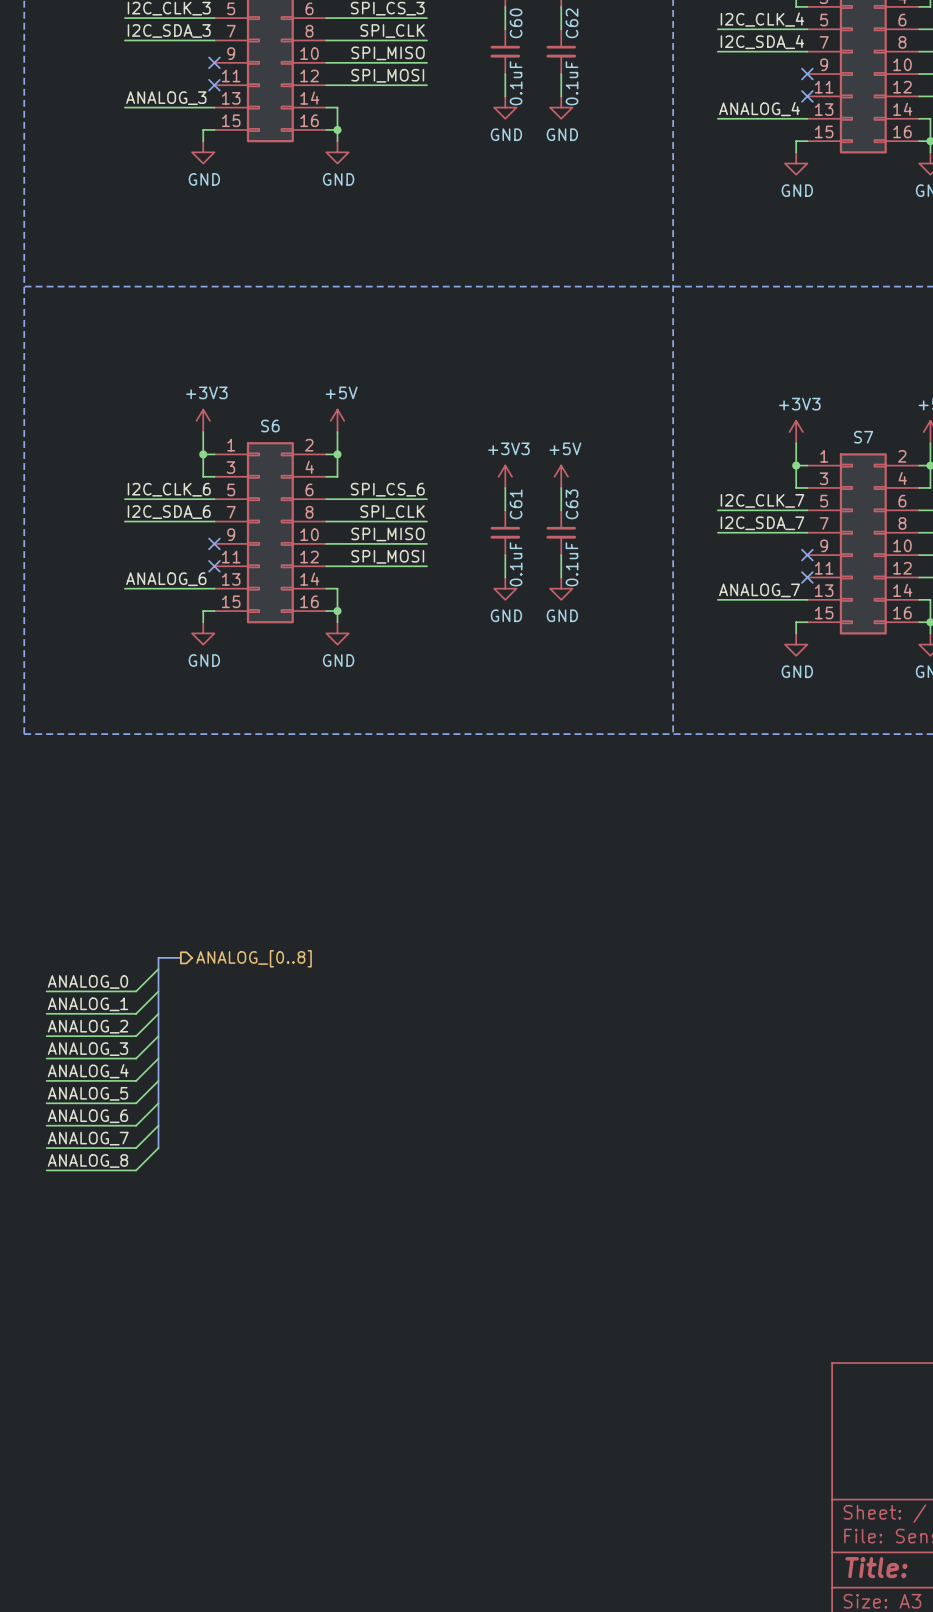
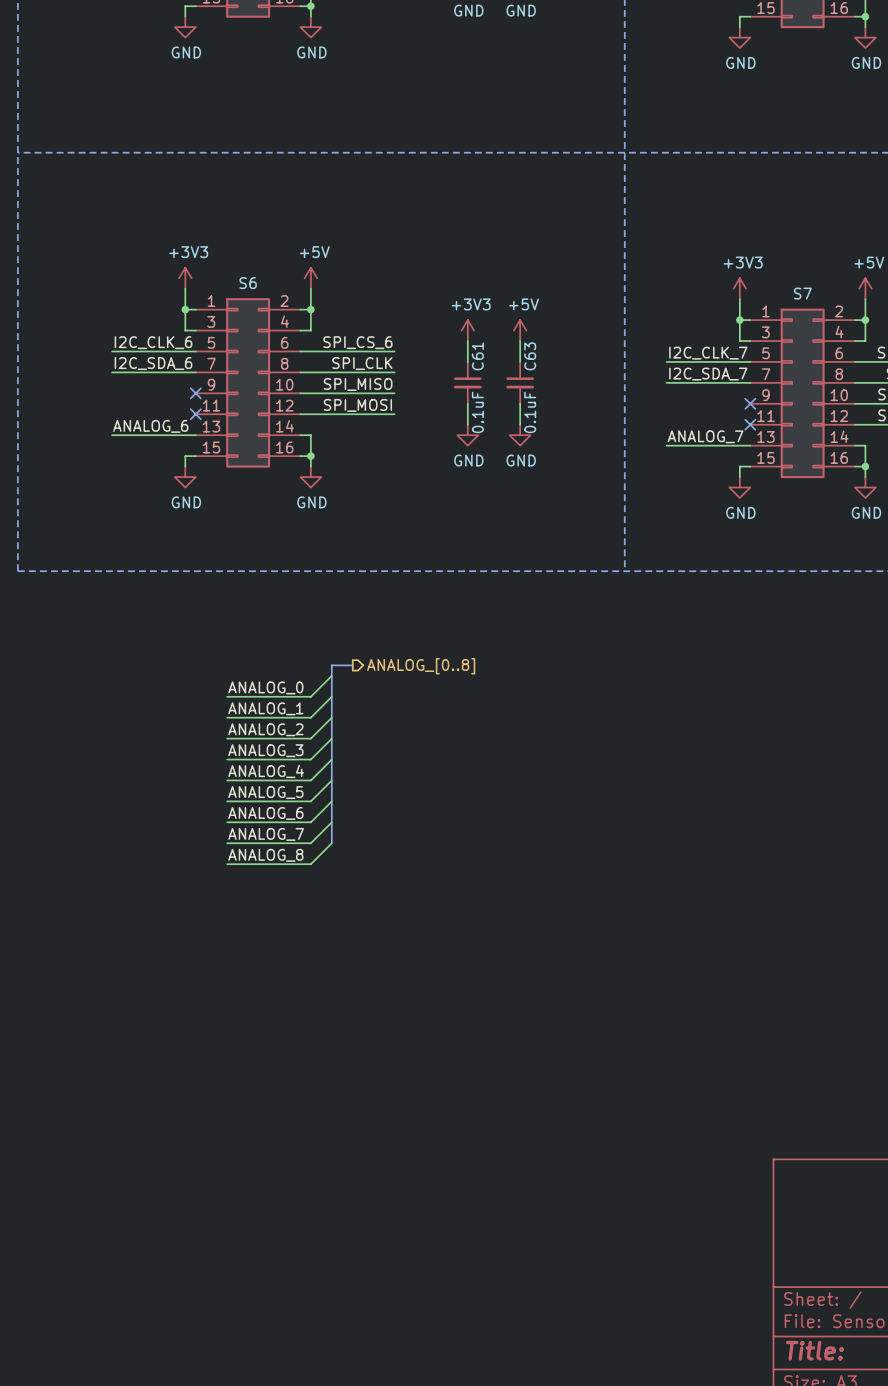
bus: none -> (352, 665) (331, 665) (331, 843)
hierarchical label: none -> ANALOG_[0..8] (421, 666)
wire: none -> (331, 675) (310, 696) (227, 696)
label: none -> ANALOG_0 (265, 687)
wire: none -> (331, 696) (310, 717) (227, 717)
label: none -> ANALOG_1 (265, 708)
label: none -> ANALOG_2 (265, 729)
label: none -> ANALOG_3 (265, 750)
label: none -> ANALOG_4 (266, 771)
bus: (180, 957) (158, 957) (158, 1148) -> none
hierarchical label: ANALOG_[0..8] (254, 958) -> none
wire: (158, 969) (136, 991) (46, 991) -> (331, 717) (310, 738) (227, 738)
label: none -> ANALOG_5 (265, 792)
label: ANALOG_0 (87, 981) -> none
wire: (158, 991) (136, 1013) (46, 1013) -> (331, 738) (310, 759) (227, 759)
label: none -> ANALOG_6 (265, 813)
label: ANALOG_1 (87, 1004) -> none
wire: (158, 1013) (136, 1036) (46, 1036) -> (331, 759) (310, 780) (227, 780)
label: none -> ANALOG_7 (266, 834)
label: ANALOG_2 (87, 1026) -> none
wire: (158, 1036) (136, 1058) (46, 1058) -> (331, 780) (310, 801) (227, 801)
label: none -> ANALOG_8 (265, 855)
label: ANALOG_3 (87, 1049) -> none
wire: (158, 1058) (136, 1080) (46, 1080) -> (331, 801) (310, 822) (227, 822)
label: ANALOG_4 (88, 1071) -> none
wire: (158, 1080) (136, 1103) (46, 1103) -> (331, 822) (310, 843) (227, 843)
label: ANALOG_5 (87, 1093) -> none
wire: (158, 1103) (136, 1125) (46, 1125) -> (331, 843) (310, 864) (227, 864)
label: ANALOG_6 (87, 1116) -> none
wire: (158, 1125) (136, 1148) (46, 1148) -> none
label: ANALOG_7 (88, 1138) -> none
wire: (158, 1148) (136, 1170) (46, 1170) -> none
label: ANALOG_8 (87, 1160) -> none

